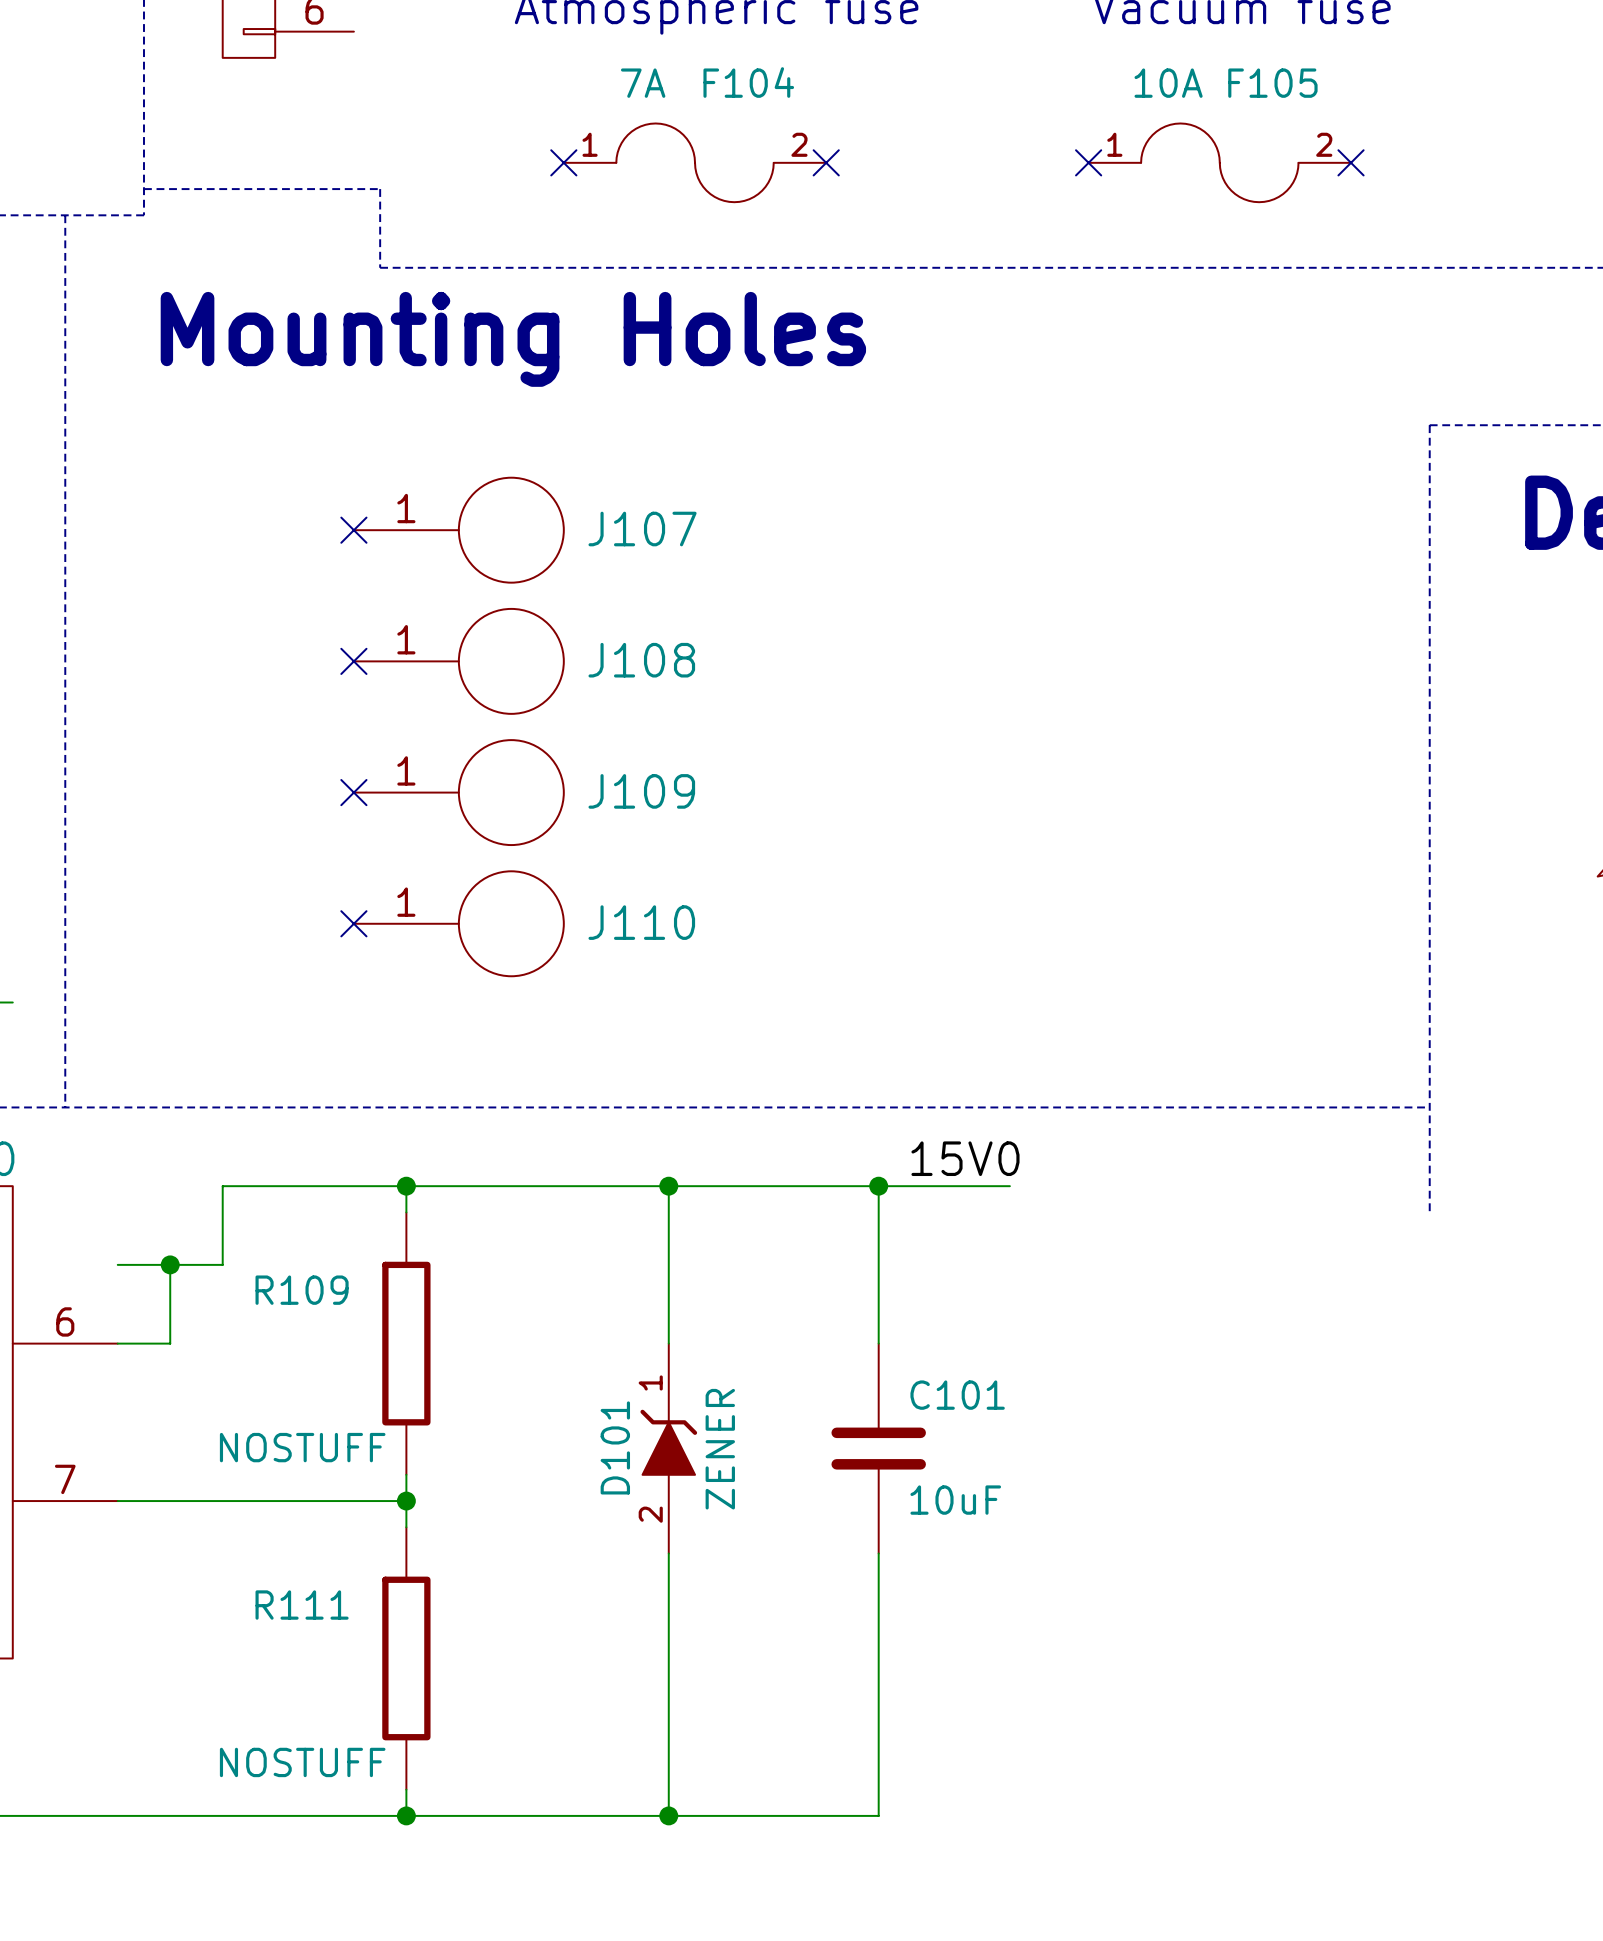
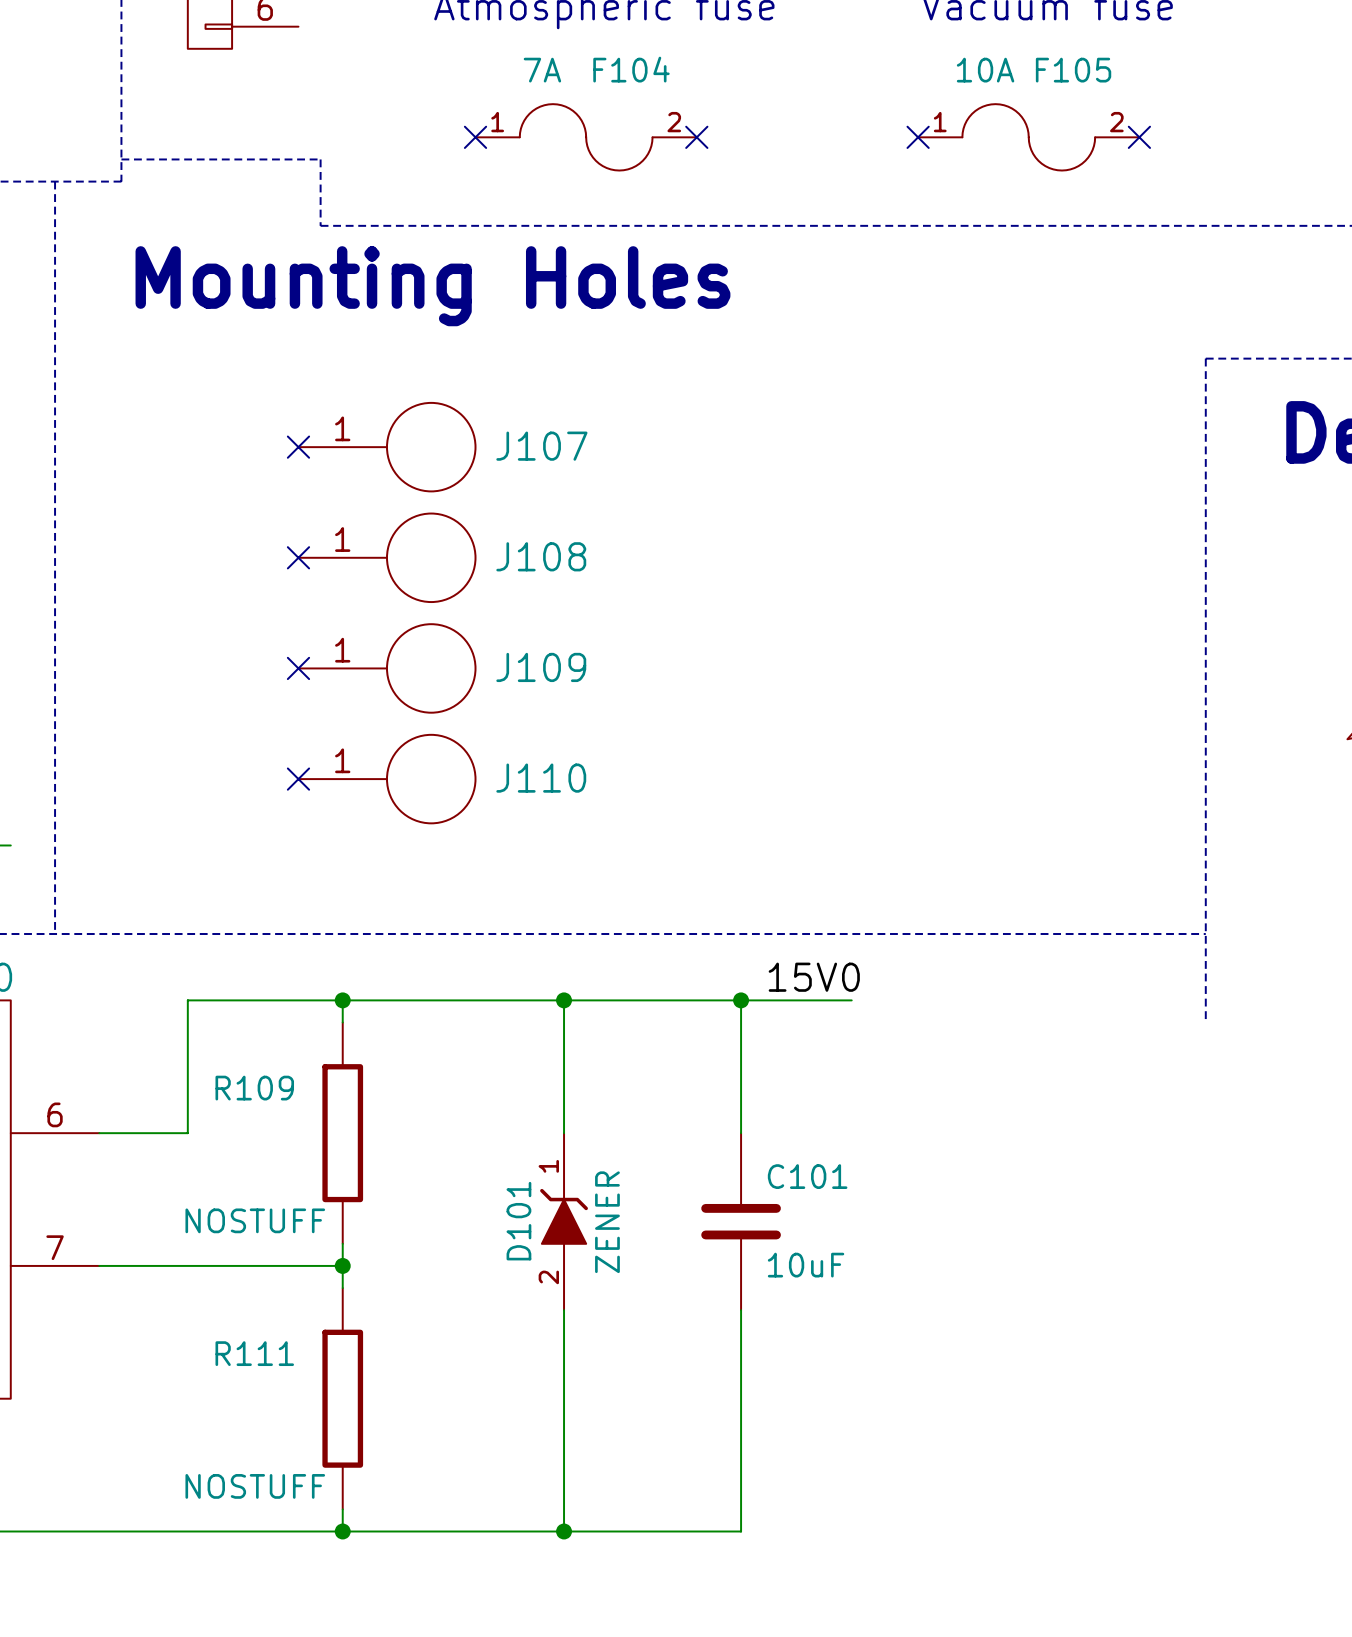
wire: (117, 1264) (222, 1264) -> none
wire: (170, 1264) (170, 1343) -> (187, 1066) (187, 1133) (143, 1133)
junction: (170, 1264) -> none

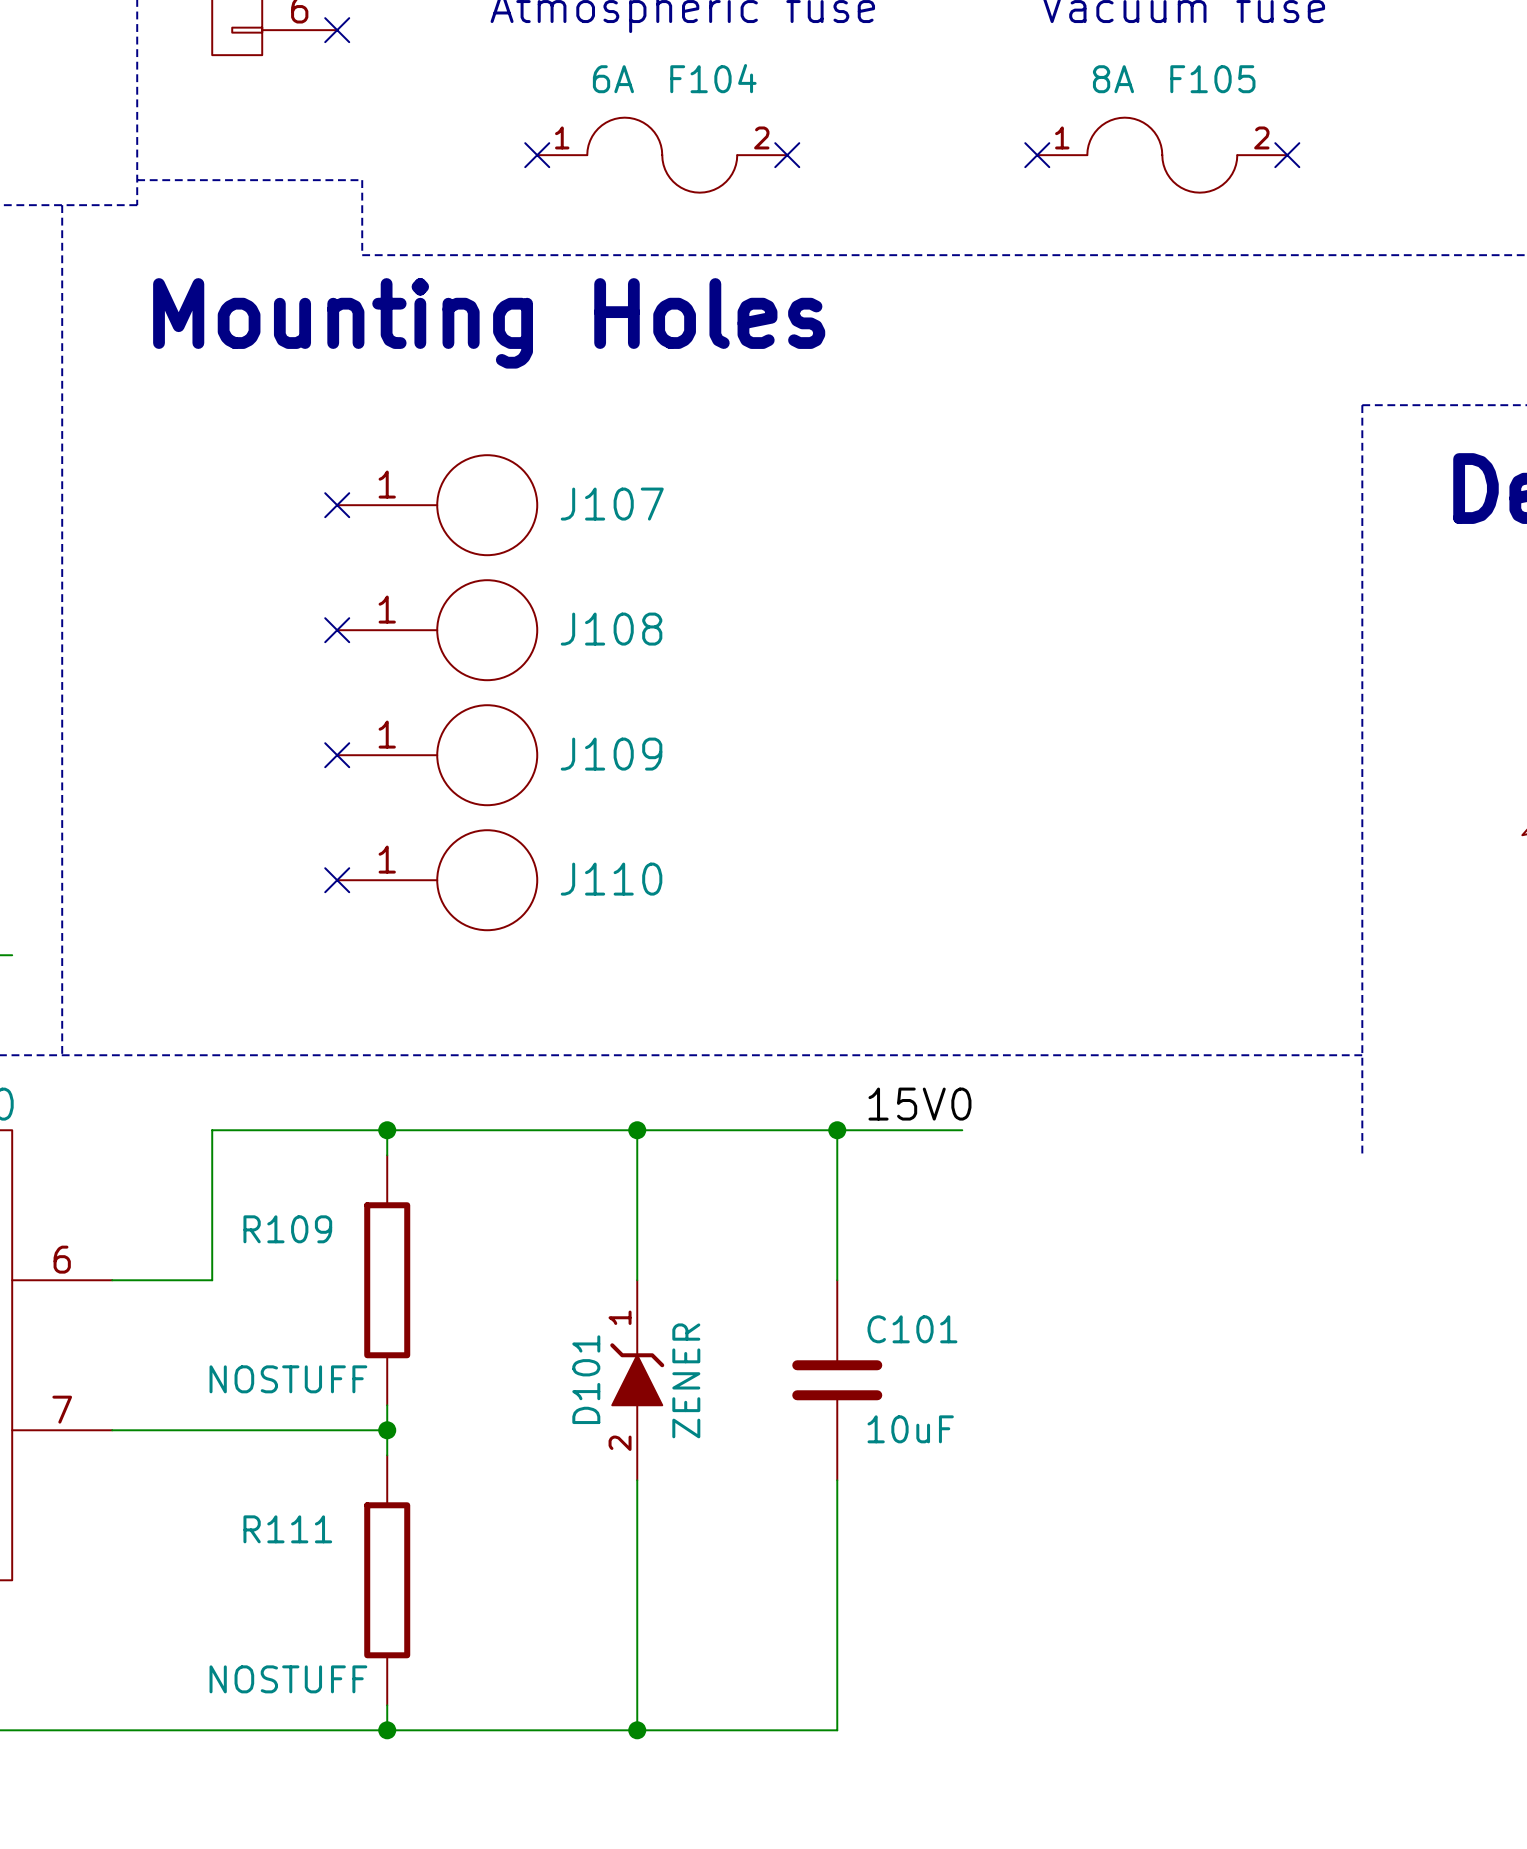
no-connect mark: none -> (337, 30)
F104 value: 7A (542, 70) -> 6A (613, 79)
F105 value: 10A (985, 70) -> 8A (1113, 79)

